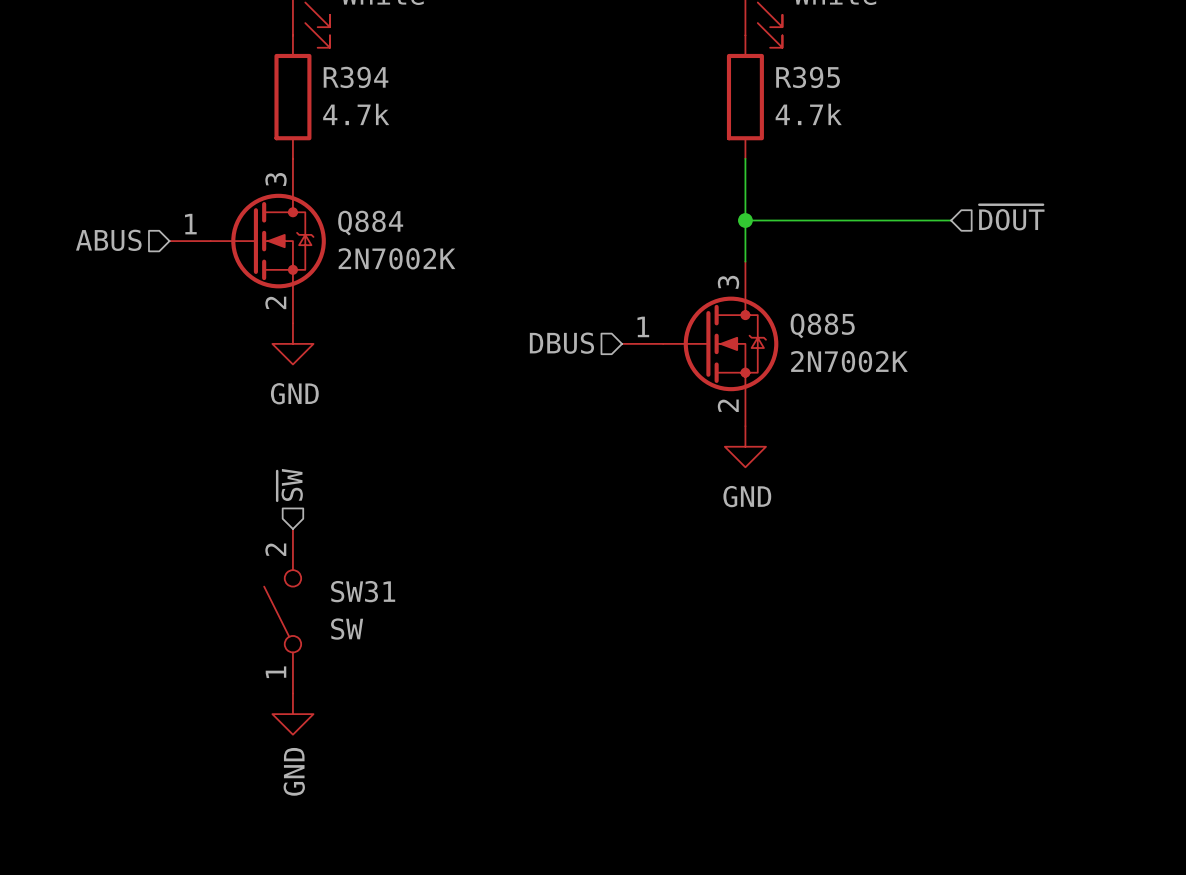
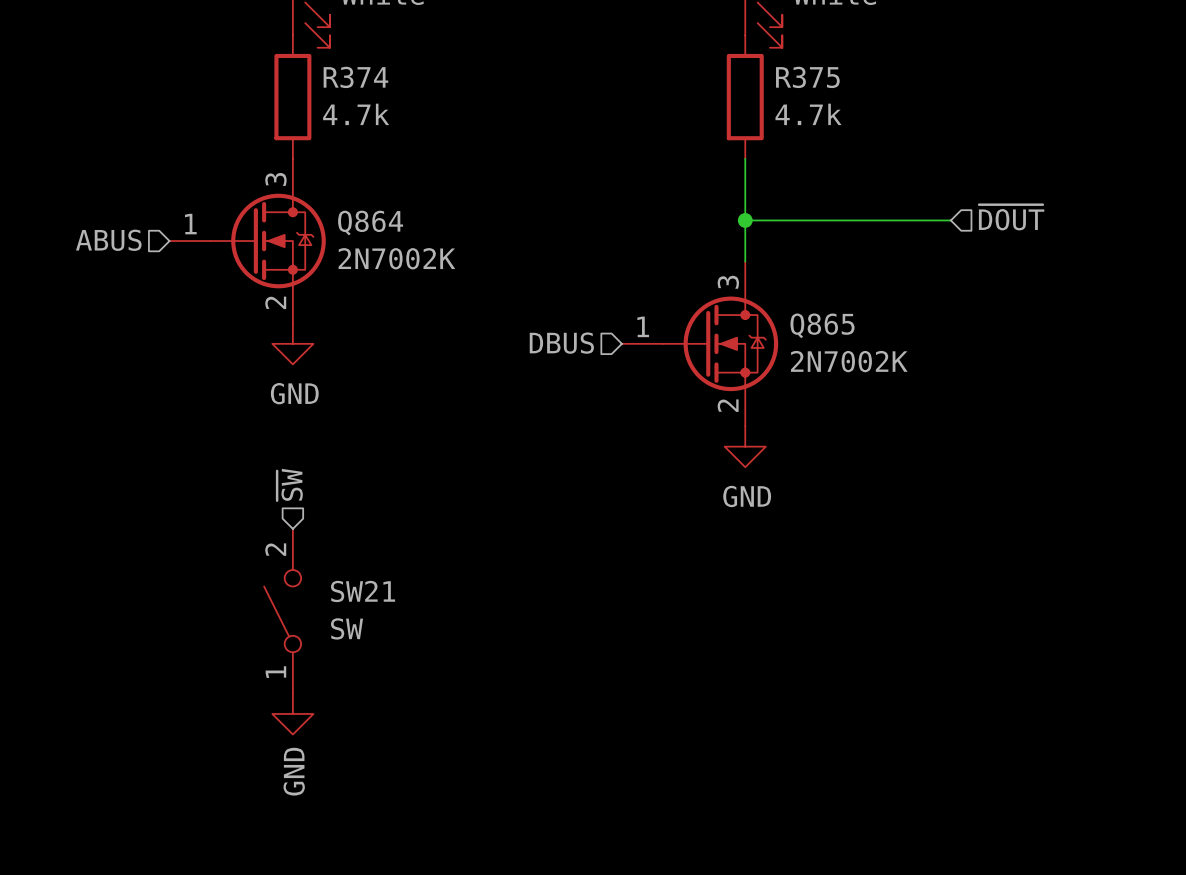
R394 name: R394 (356, 77) -> R374 (355, 77)
R395 name: R395 (808, 77) -> R375 (807, 77)
Q884 name: Q884 (370, 223) -> Q864 (370, 223)
Q885 name: Q885 (822, 325) -> Q865 (822, 325)
SW31 name: SW31 (363, 591) -> SW21 (363, 591)

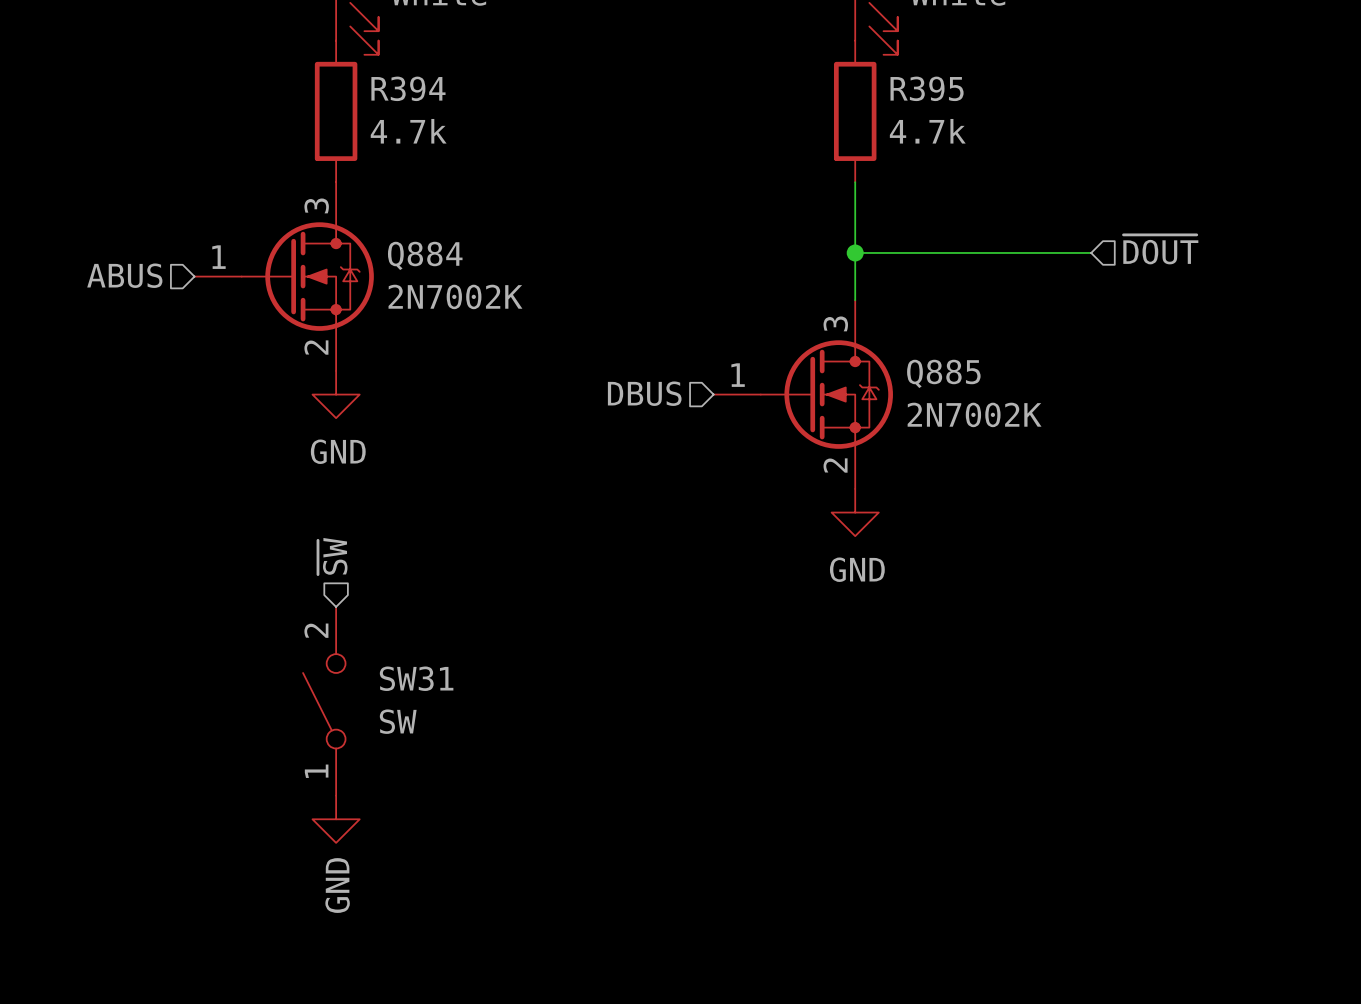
R374 name: R374 (355, 77) -> R394 (408, 88)
R375 name: R375 (807, 77) -> R395 (927, 88)
Q864 name: Q864 (370, 223) -> Q884 (425, 255)
Q865 name: Q865 (822, 325) -> Q885 (943, 373)
SW21 name: SW21 (363, 591) -> SW31 (416, 678)

